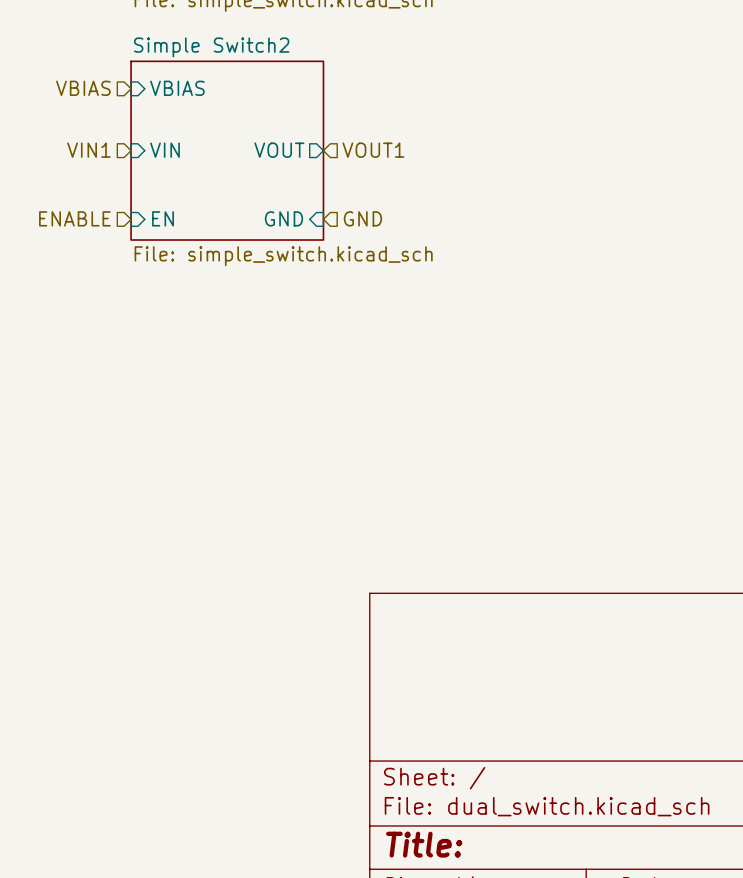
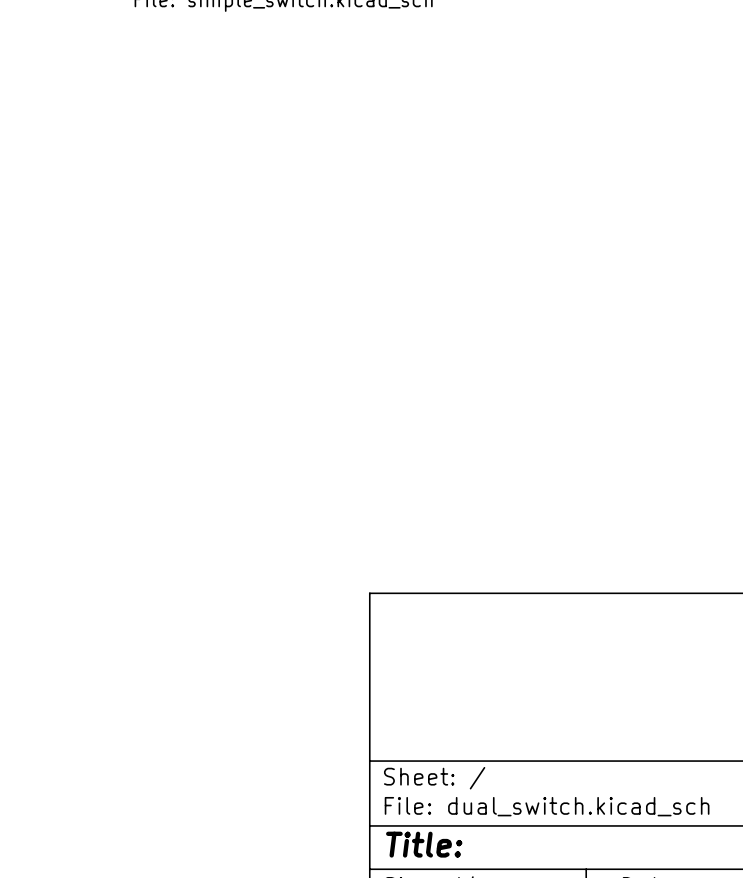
hierarchical label: VBIAS (83, 88) -> none
sheet pin: VBIAS (177, 88) -> none
hierarchical label: VIN1 (88, 150) -> none
sheet pin: VIN (164, 150) -> none
sheet Simple Switch2: File: simple_switch.kicad_sch (227, 150) -> none
sheet pin: VOUT (279, 150) -> none
hierarchical label: VOUT1 (373, 150) -> none
hierarchical label: ENABLE (74, 218) -> none
sheet pin: EN (163, 218) -> none
sheet pin: GND (283, 218) -> none
hierarchical label: GND (362, 218) -> none

